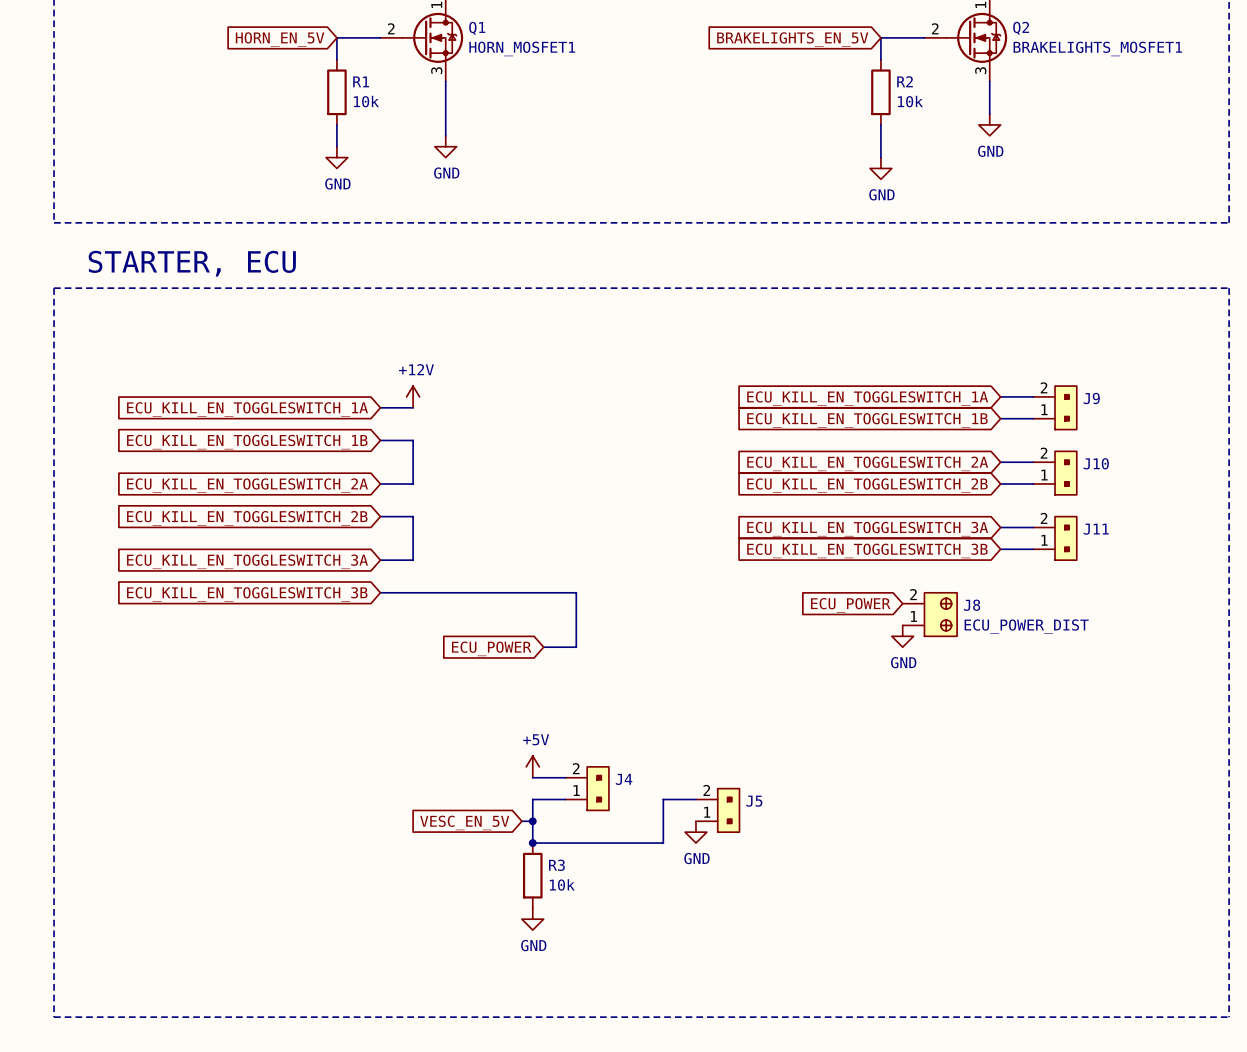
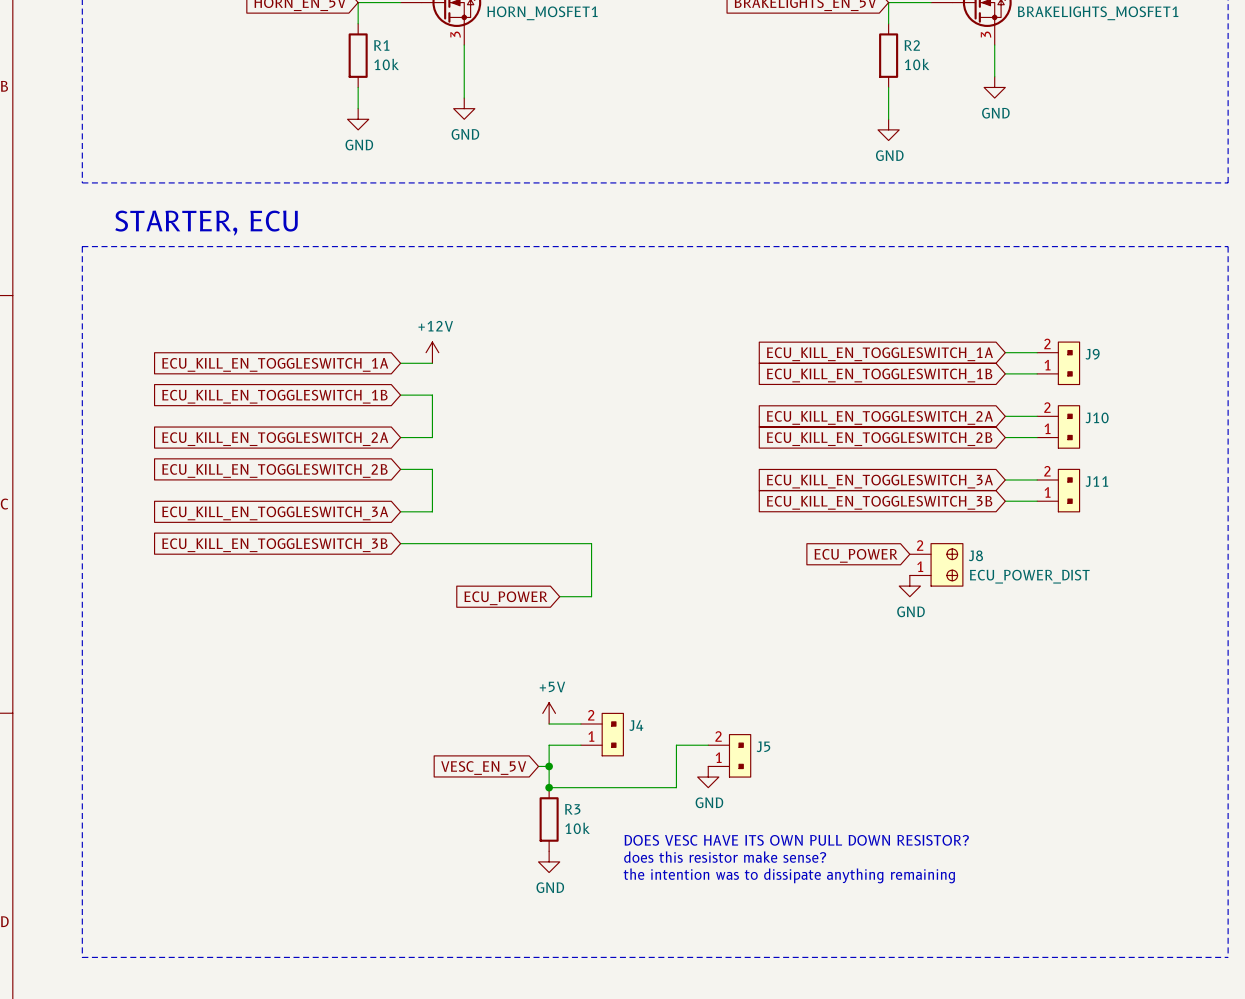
text: none -> DOES VESC HAVE ITS OWN PULL DOWN RESISTOR? (796, 840)
text: none -> does this resistor make sense? (725, 857)
text: none -> the intention was to dissipate anything remaining (789, 875)

